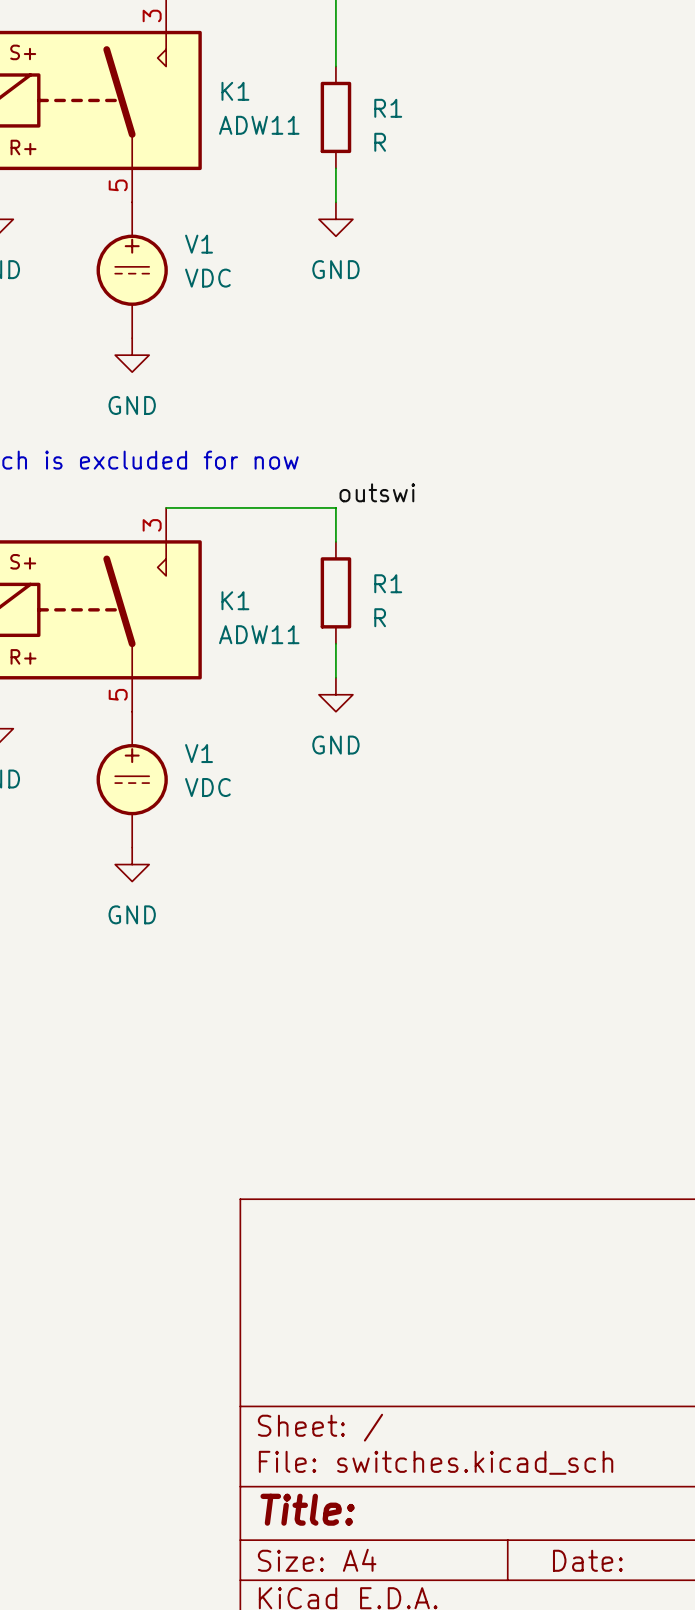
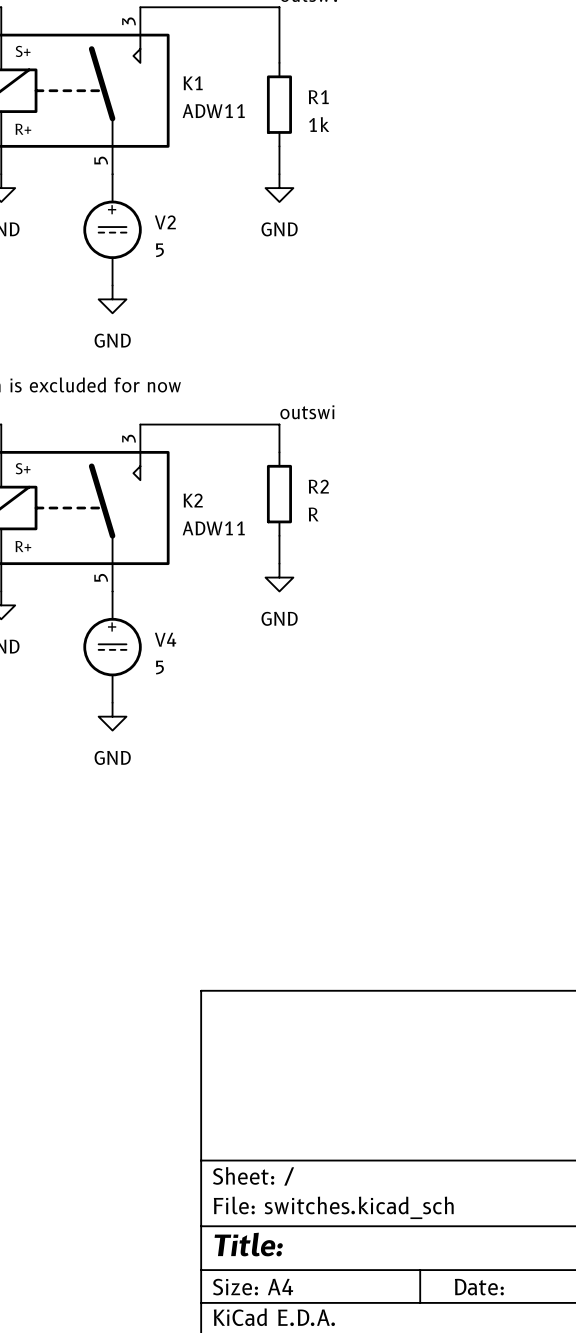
R1 value: R (380, 142) -> 1k (319, 124)
V1 name: V1 (199, 244) -> V2 (165, 222)
V1 value: VDC (207, 278) -> 5 (159, 250)
R1 name: R1 (388, 583) -> R2 (318, 486)
K1 name: K1 (235, 600) -> K2 (193, 500)
V1 name: V1 (199, 753) -> V4 (165, 639)
V1 value: VDC (207, 787) -> 5 (159, 667)

